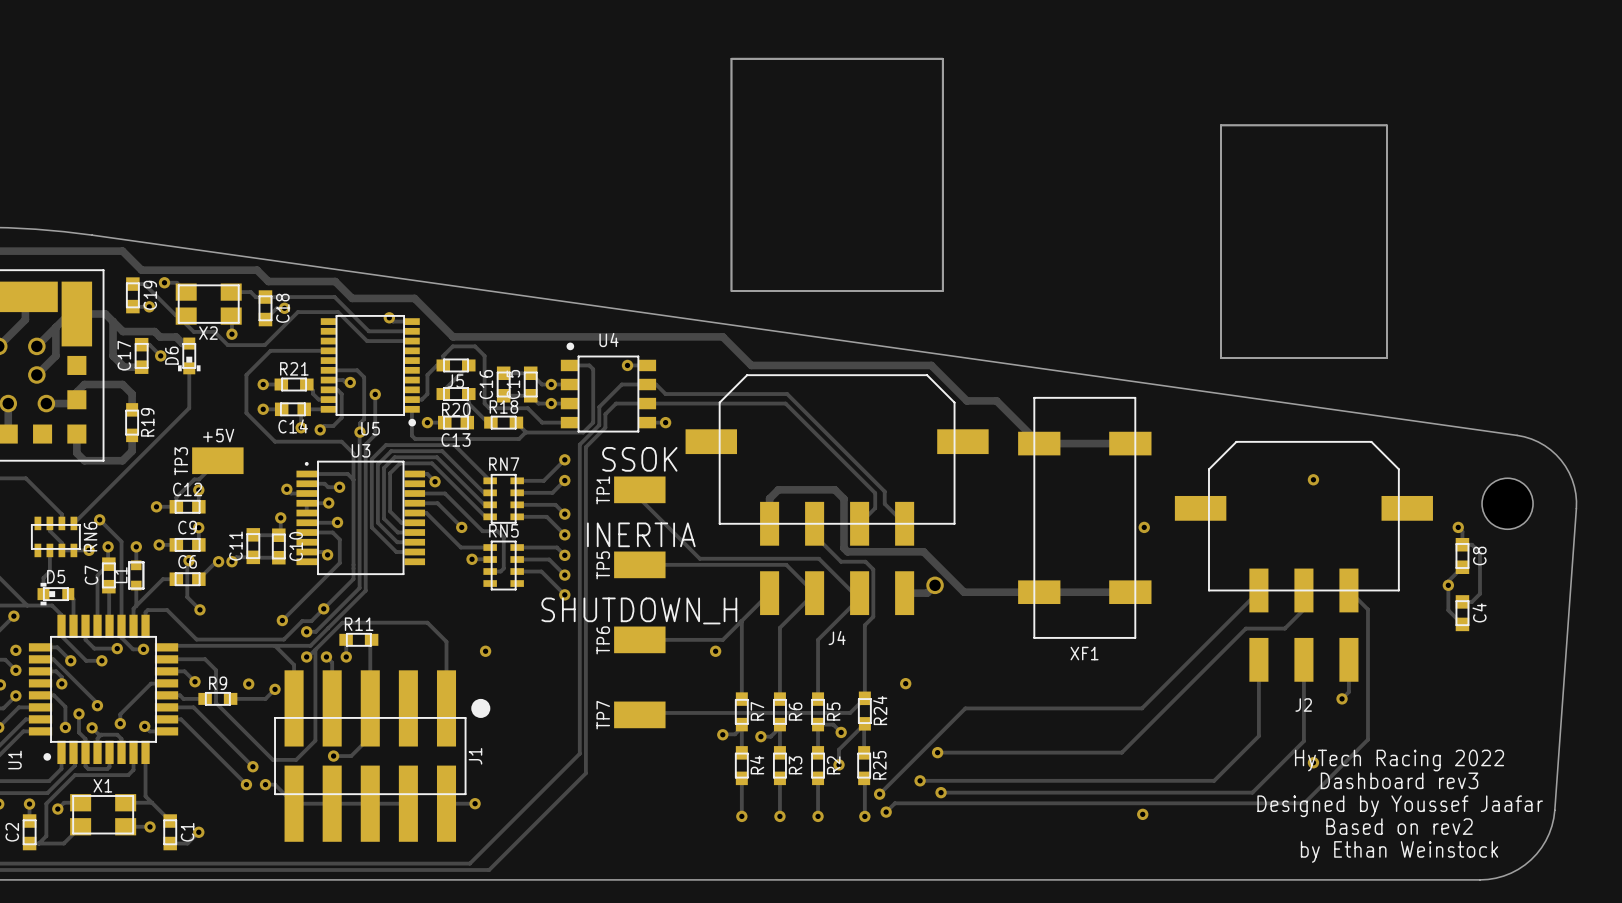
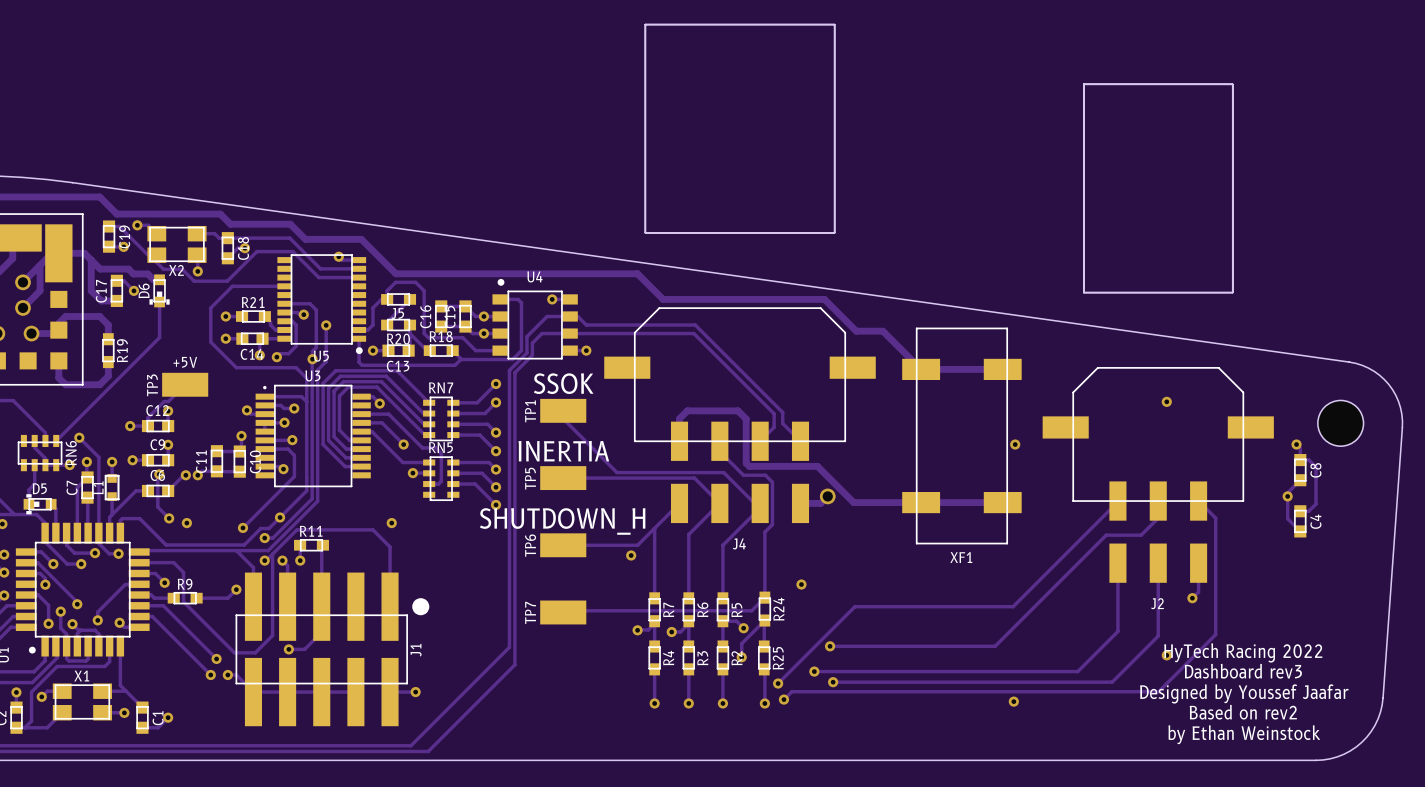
via position: (485, 651) -> (391, 523)
via position: (248, 684) -> (186, 523)

